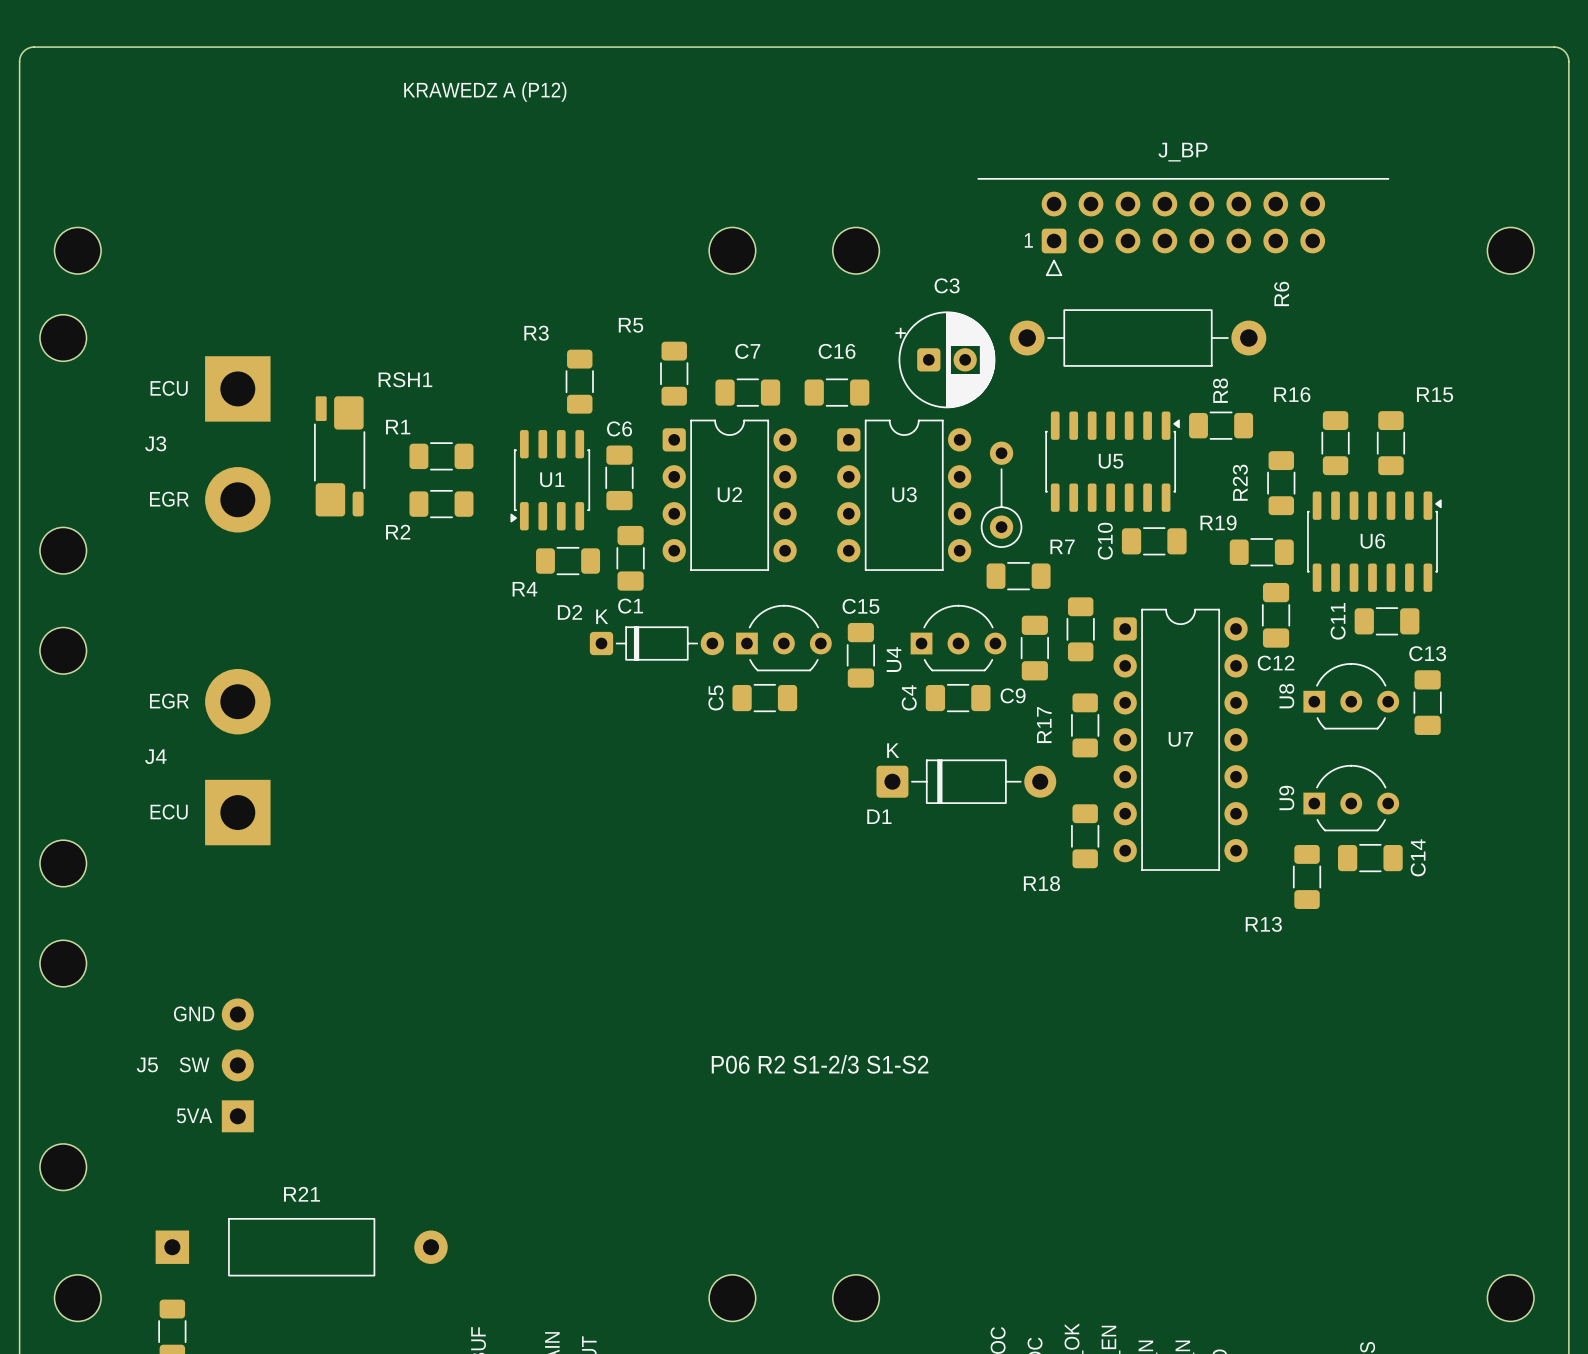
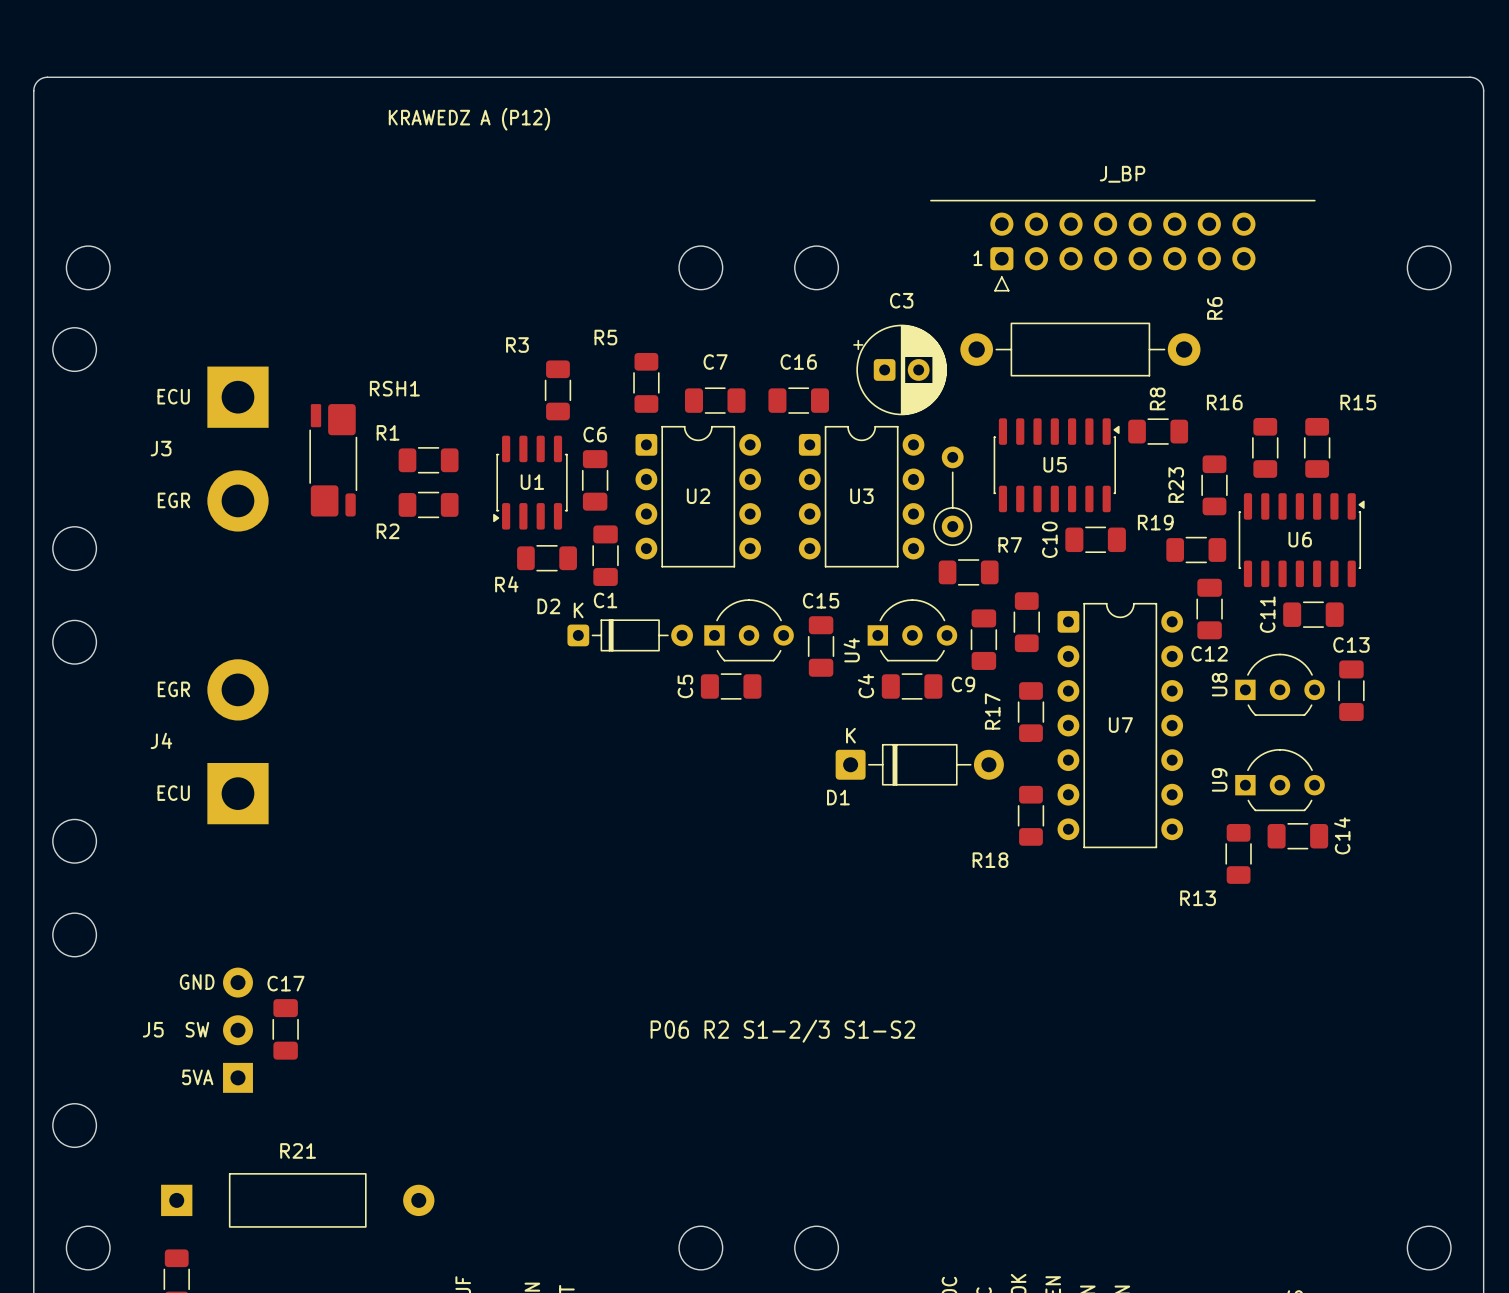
C17: none -> (285, 1029)

